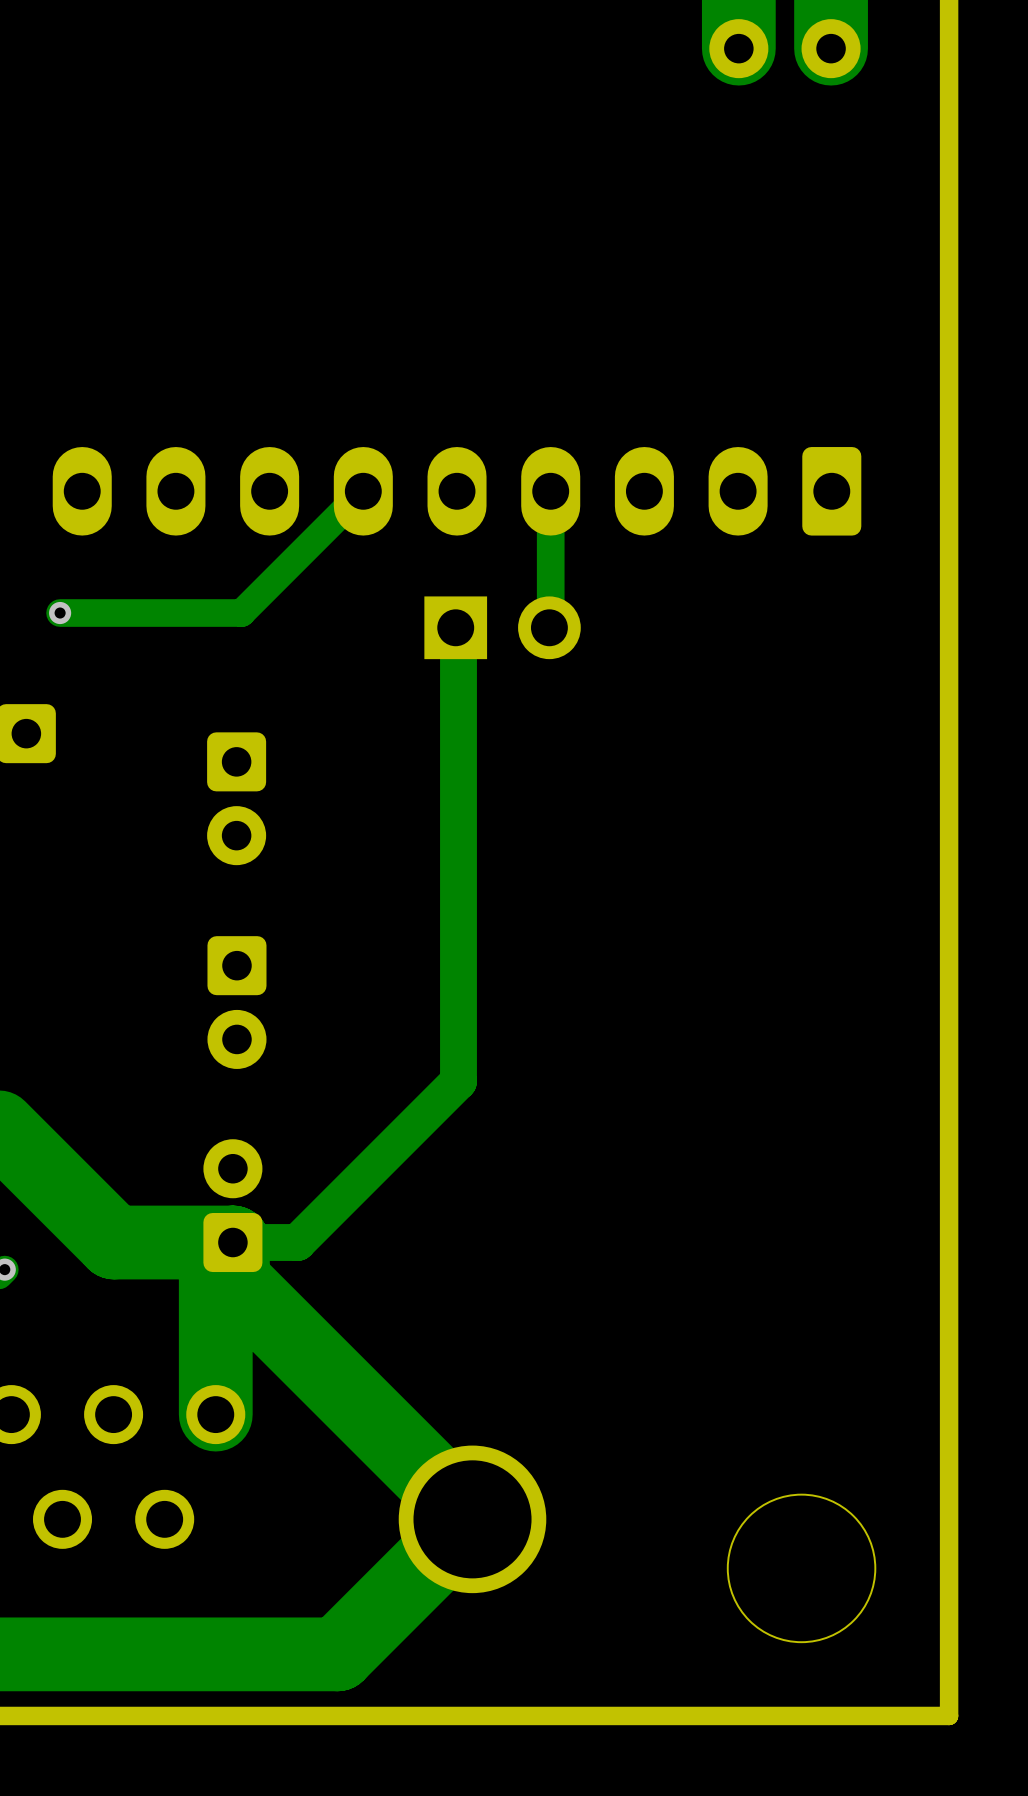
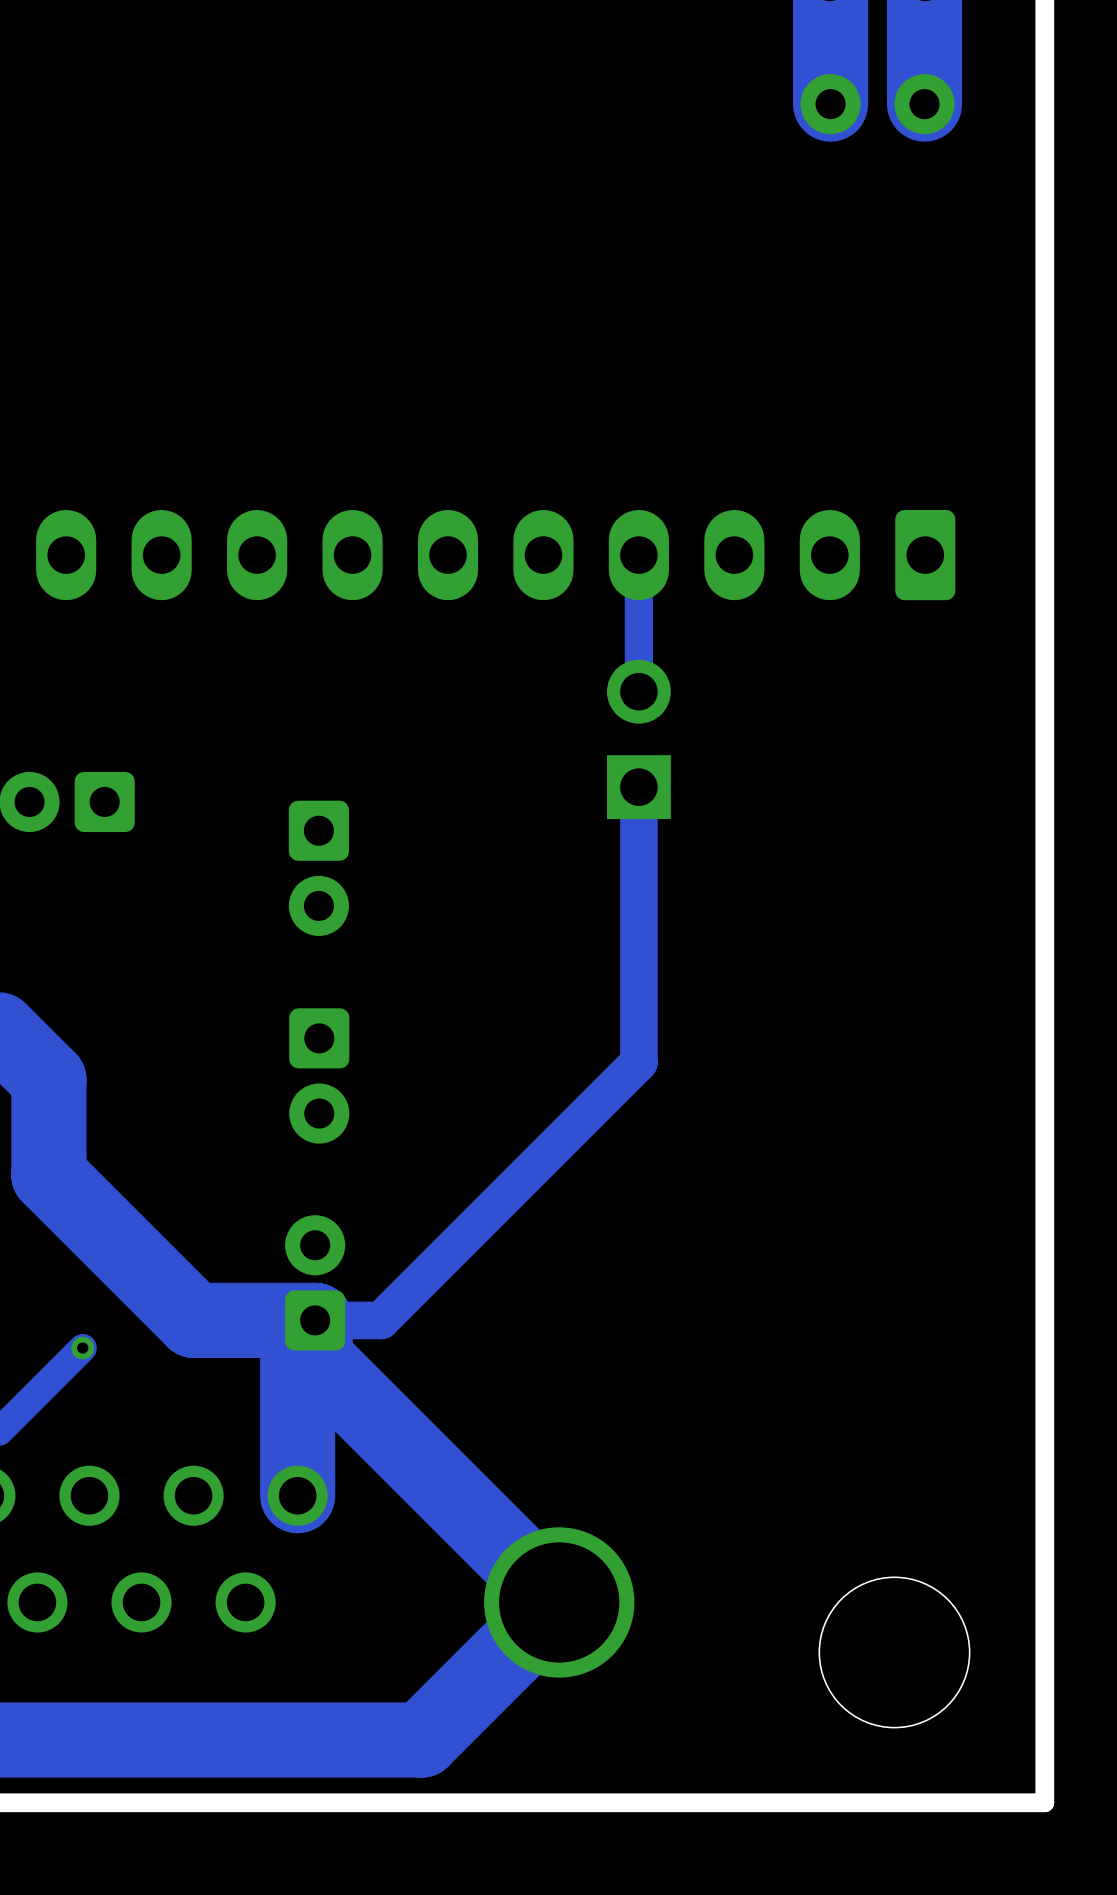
track: (363, 491) (241, 613) (60, 613) -> none
via: (60, 613) -> none
track: (455, 627) (458, 630) (458, 1081) -> (638, 787) (638, 1062) (544, 1156)
part rotation: 0° (502, 627) -> 90° counterclockwise (638, 739)

